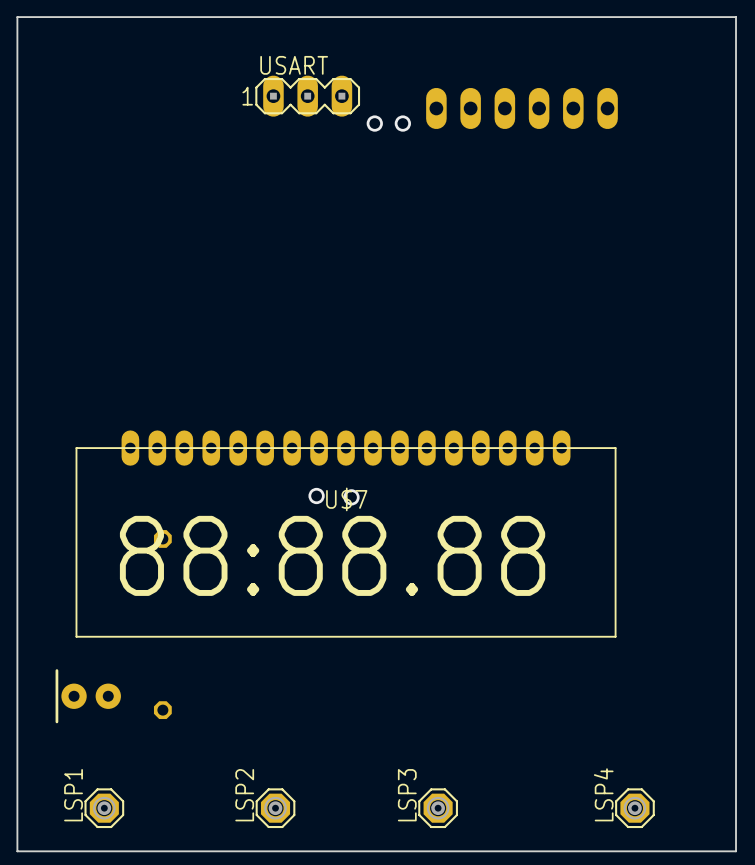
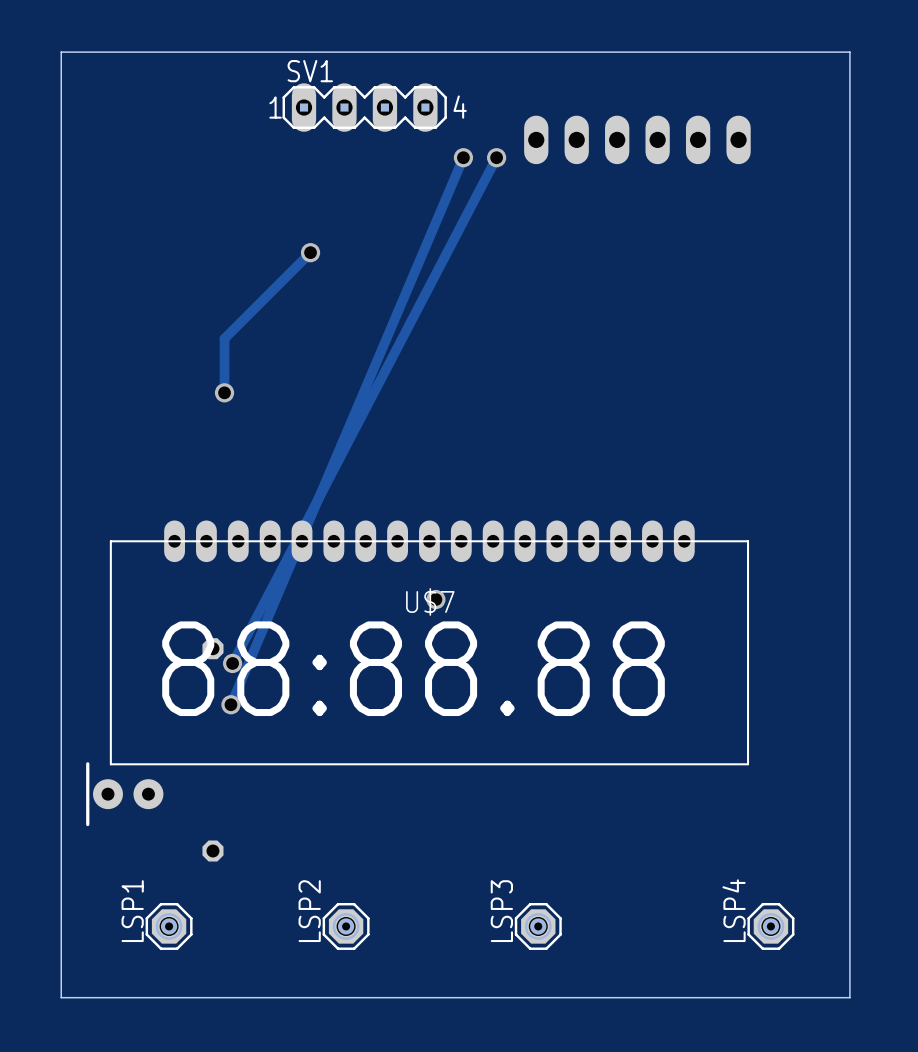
board edge: (17, 17) (736, 17) (736, 851) (17, 851) (17, 17) -> (61, 52) (61, 997) (849, 997) (849, 52) (61, 52)
SV1: none -> (364, 107)
USART: (307, 96) -> none
track: none -> (463, 157) (230, 704)
track: none -> (496, 157) (232, 663)
track: none -> (310, 252) (224, 338) (224, 392)
via: none -> (310, 252)
via: none -> (224, 392)
via: (316, 495) -> none
via: none -> (232, 663)
via: none -> (230, 704)
part position: (88, 696) -> (124, 794)
LSP1 position: (104, 808) -> (169, 926)
LSP2 position: (275, 808) -> (346, 926)
LSP3 position: (438, 808) -> (538, 926)
LSP4 position: (634, 808) -> (770, 926)

